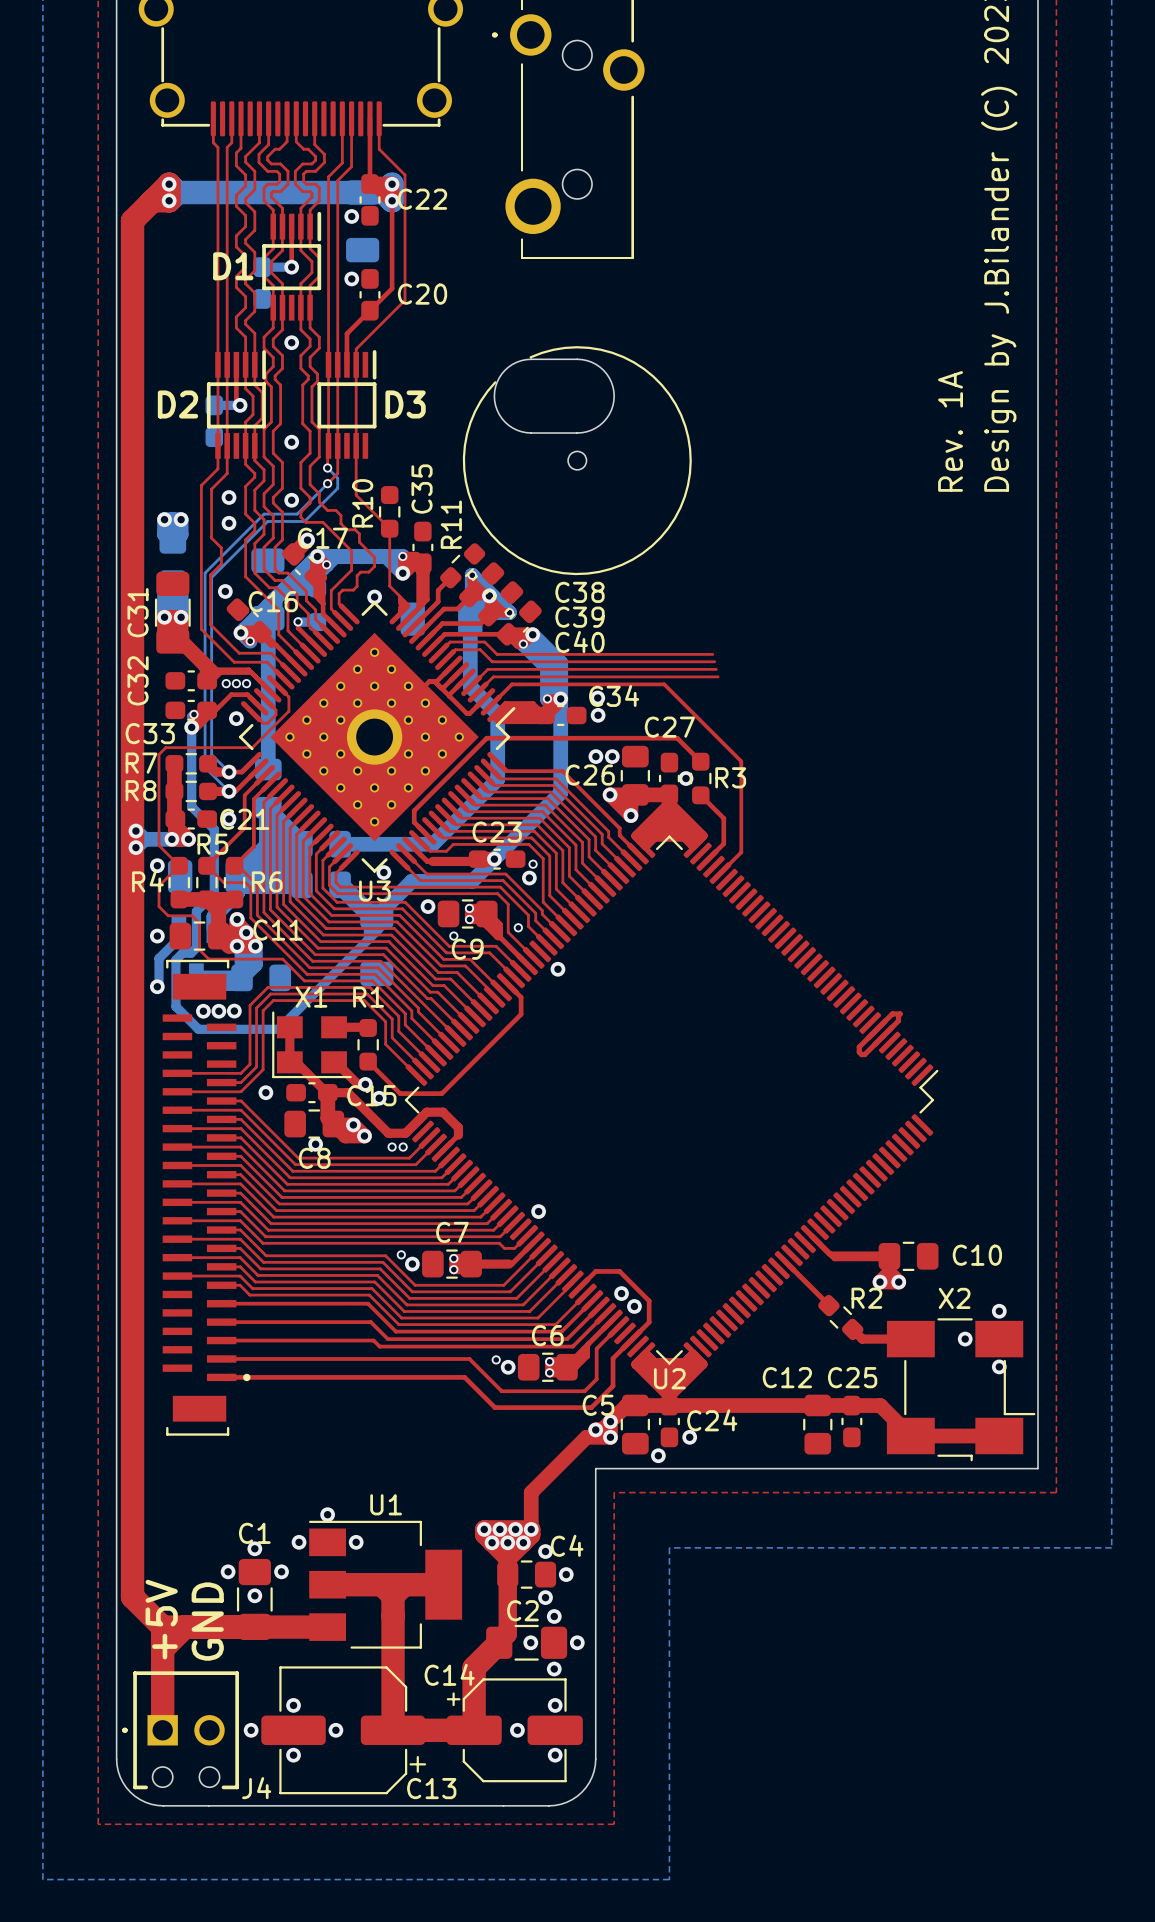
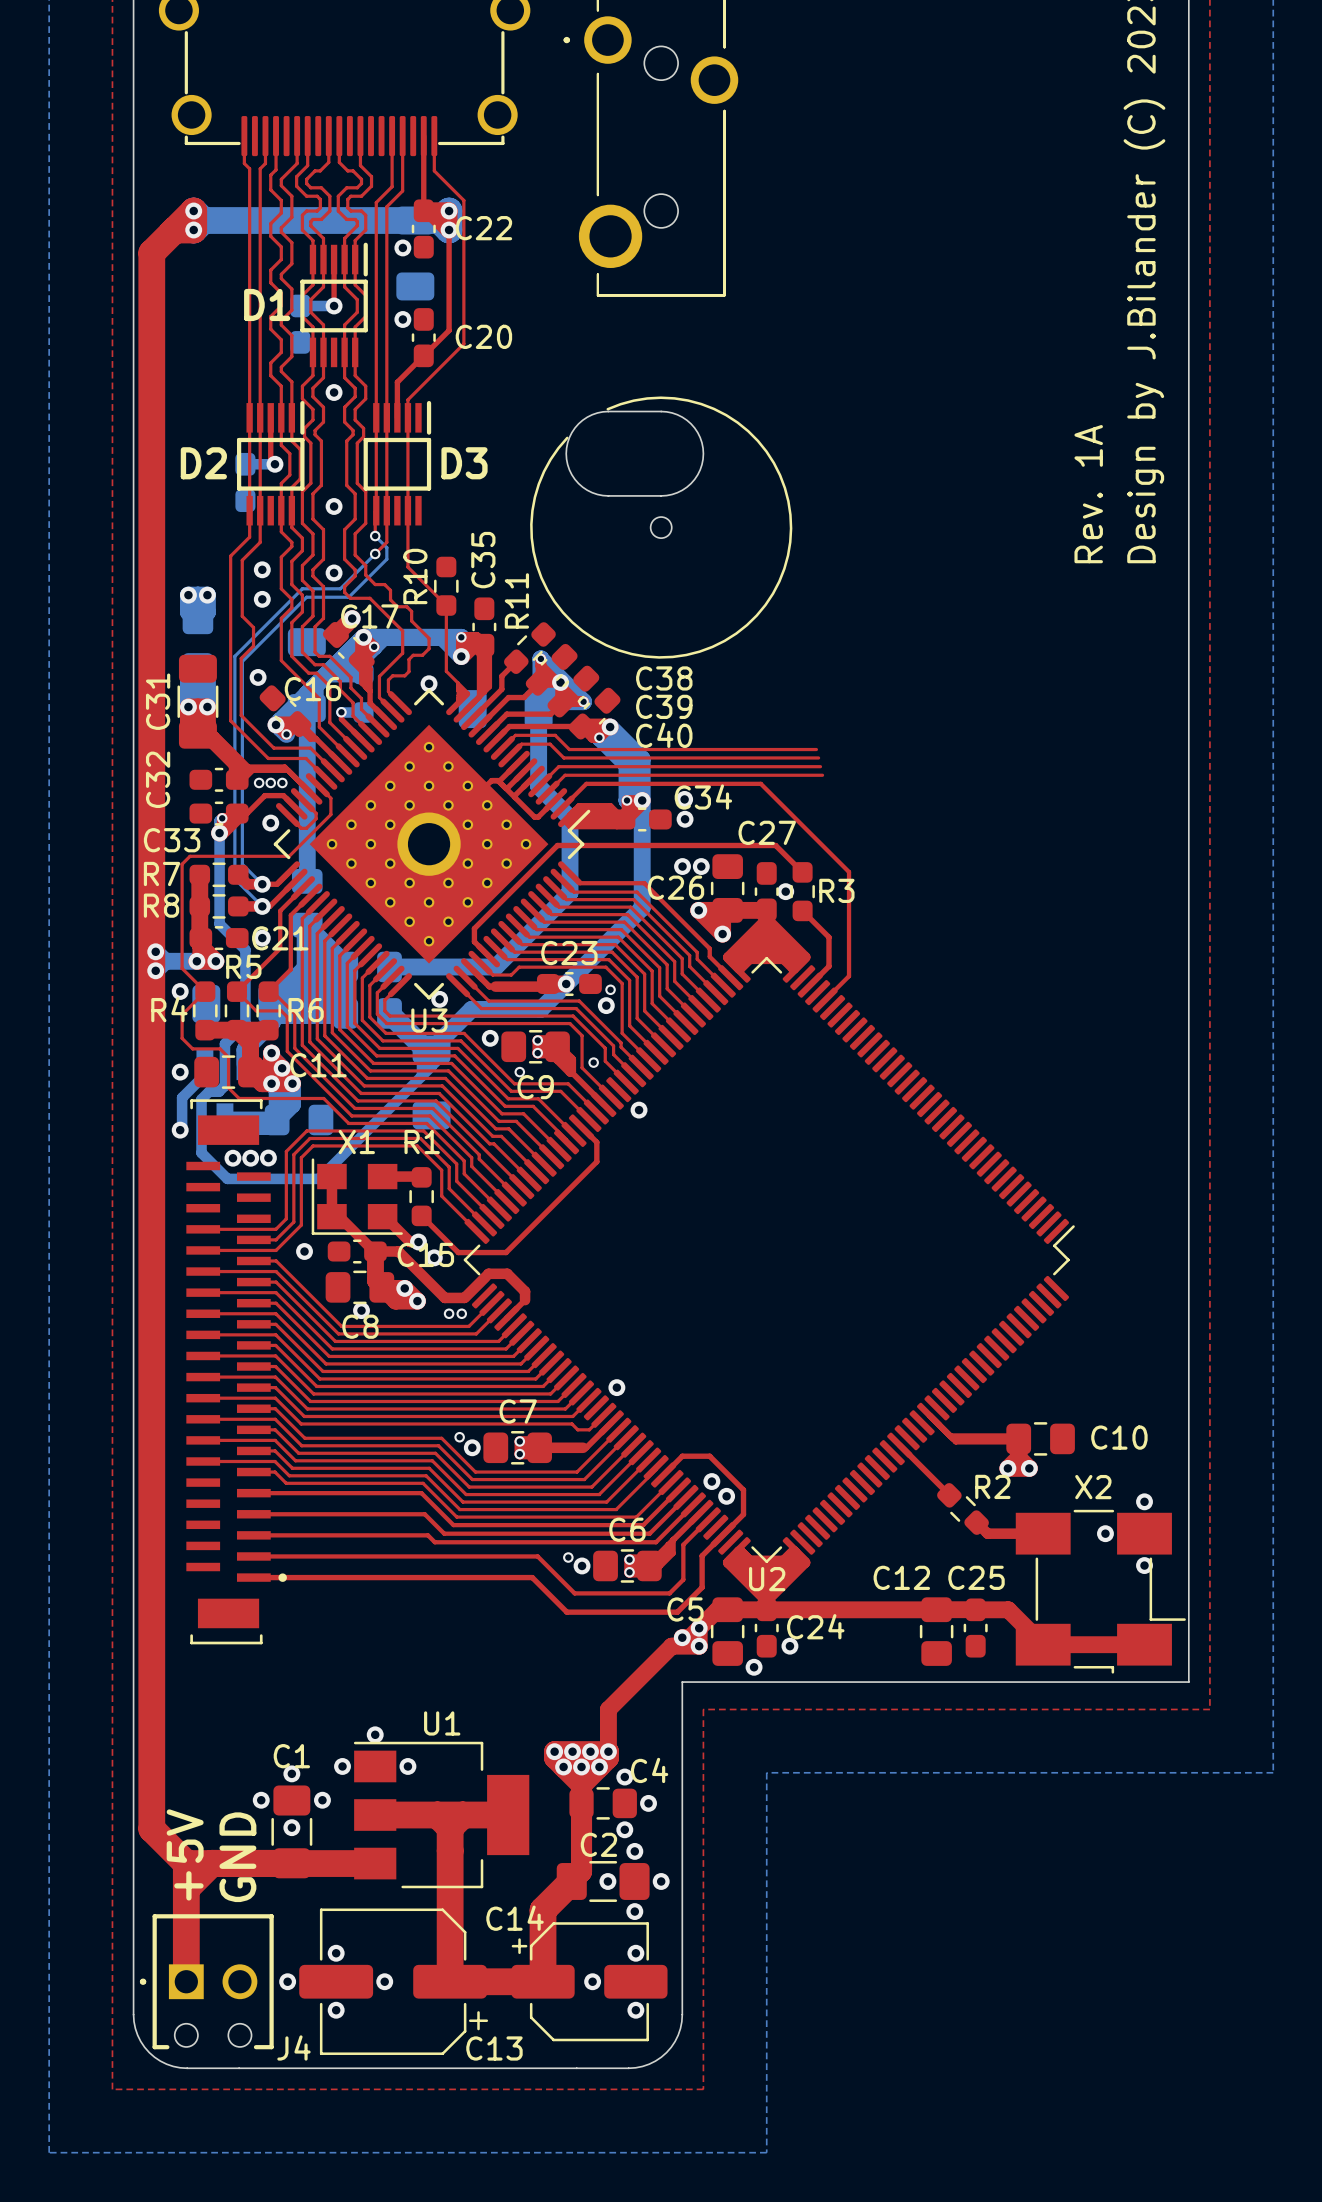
top track: (892, 1013) (859, 1047) (859, 1052) (861, 1054) (864, 1054) (898, 1020) (900, 1013) (892, 1013) -> none

